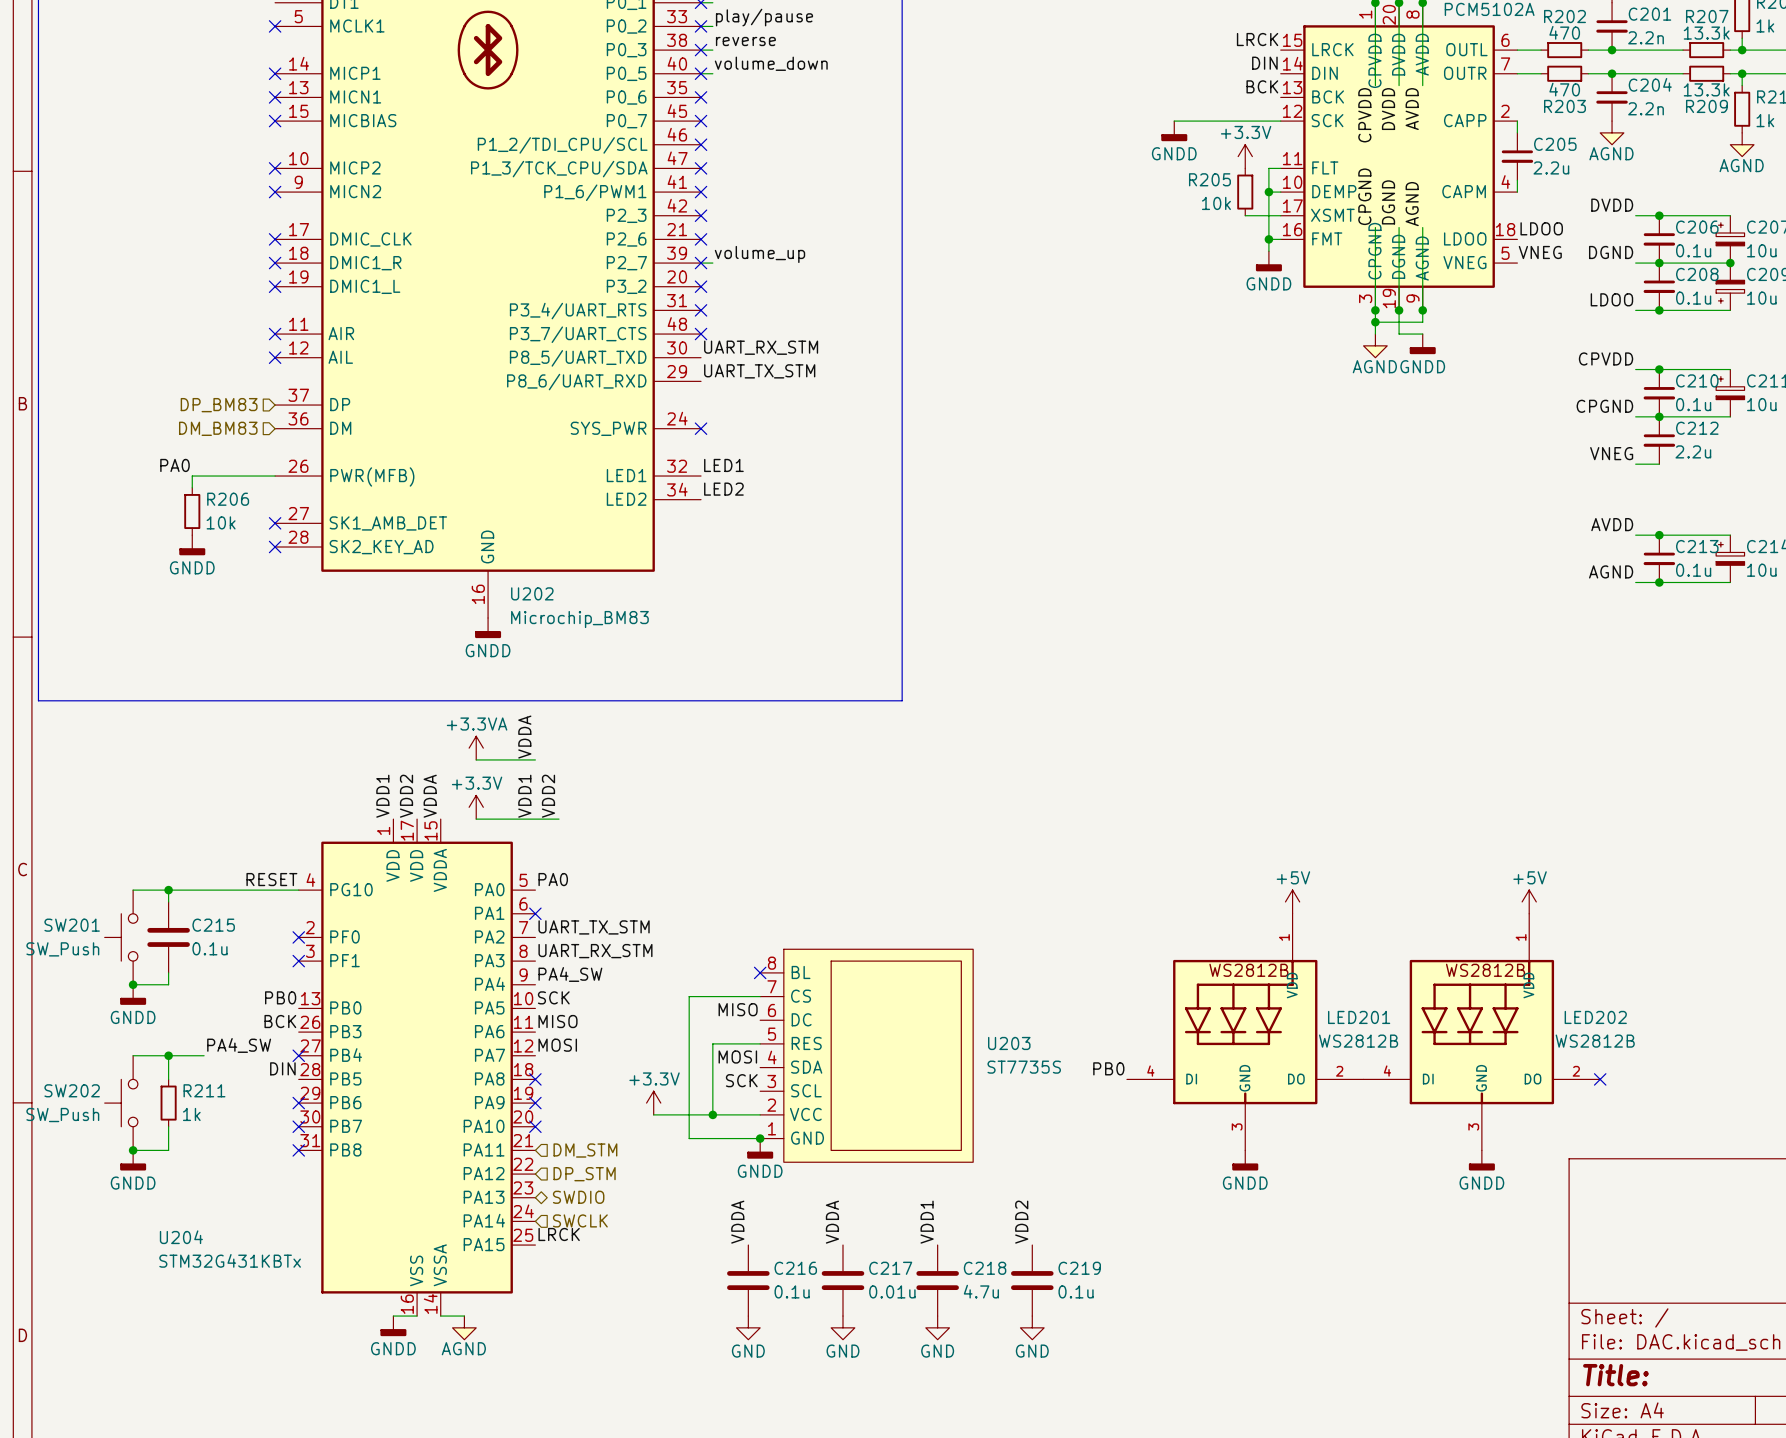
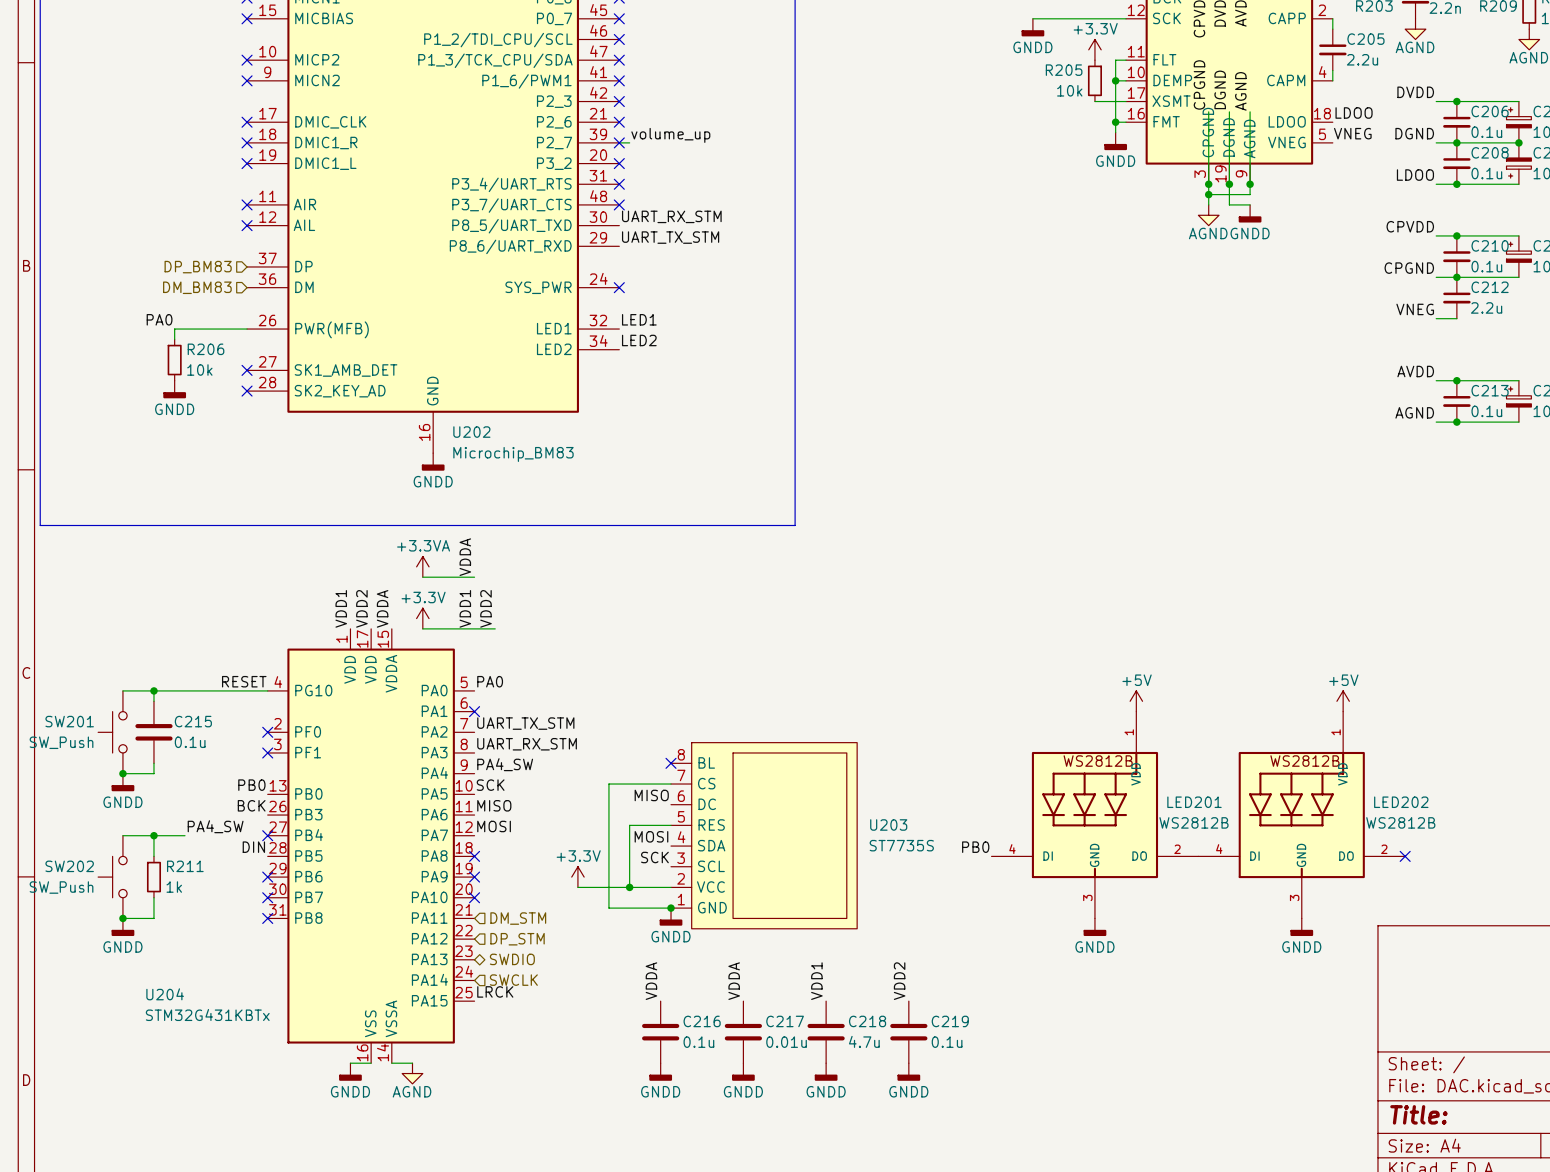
power symbol: GND (748, 1327) -> GNDD (660, 1071)
power symbol: GND (842, 1327) -> GNDD (743, 1071)
power symbol: GND (937, 1327) -> GNDD (826, 1071)
power symbol: GND (1032, 1327) -> GNDD (908, 1071)

